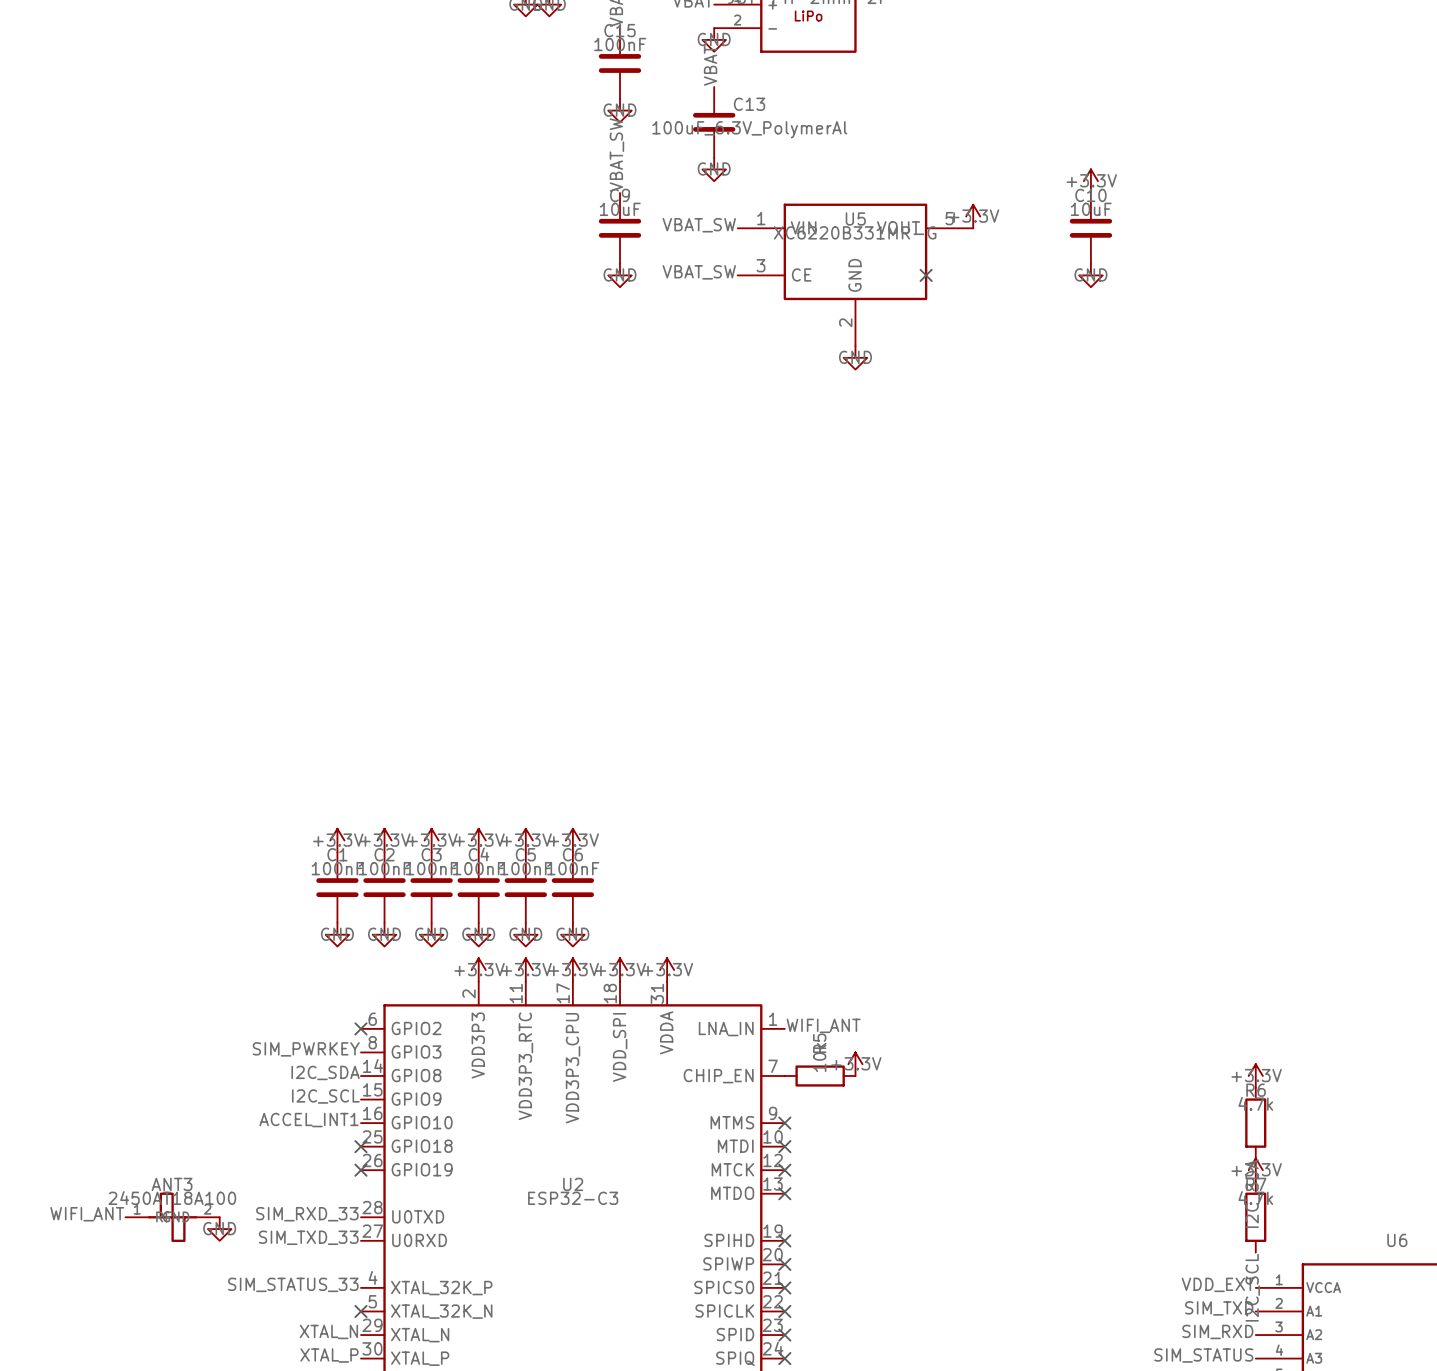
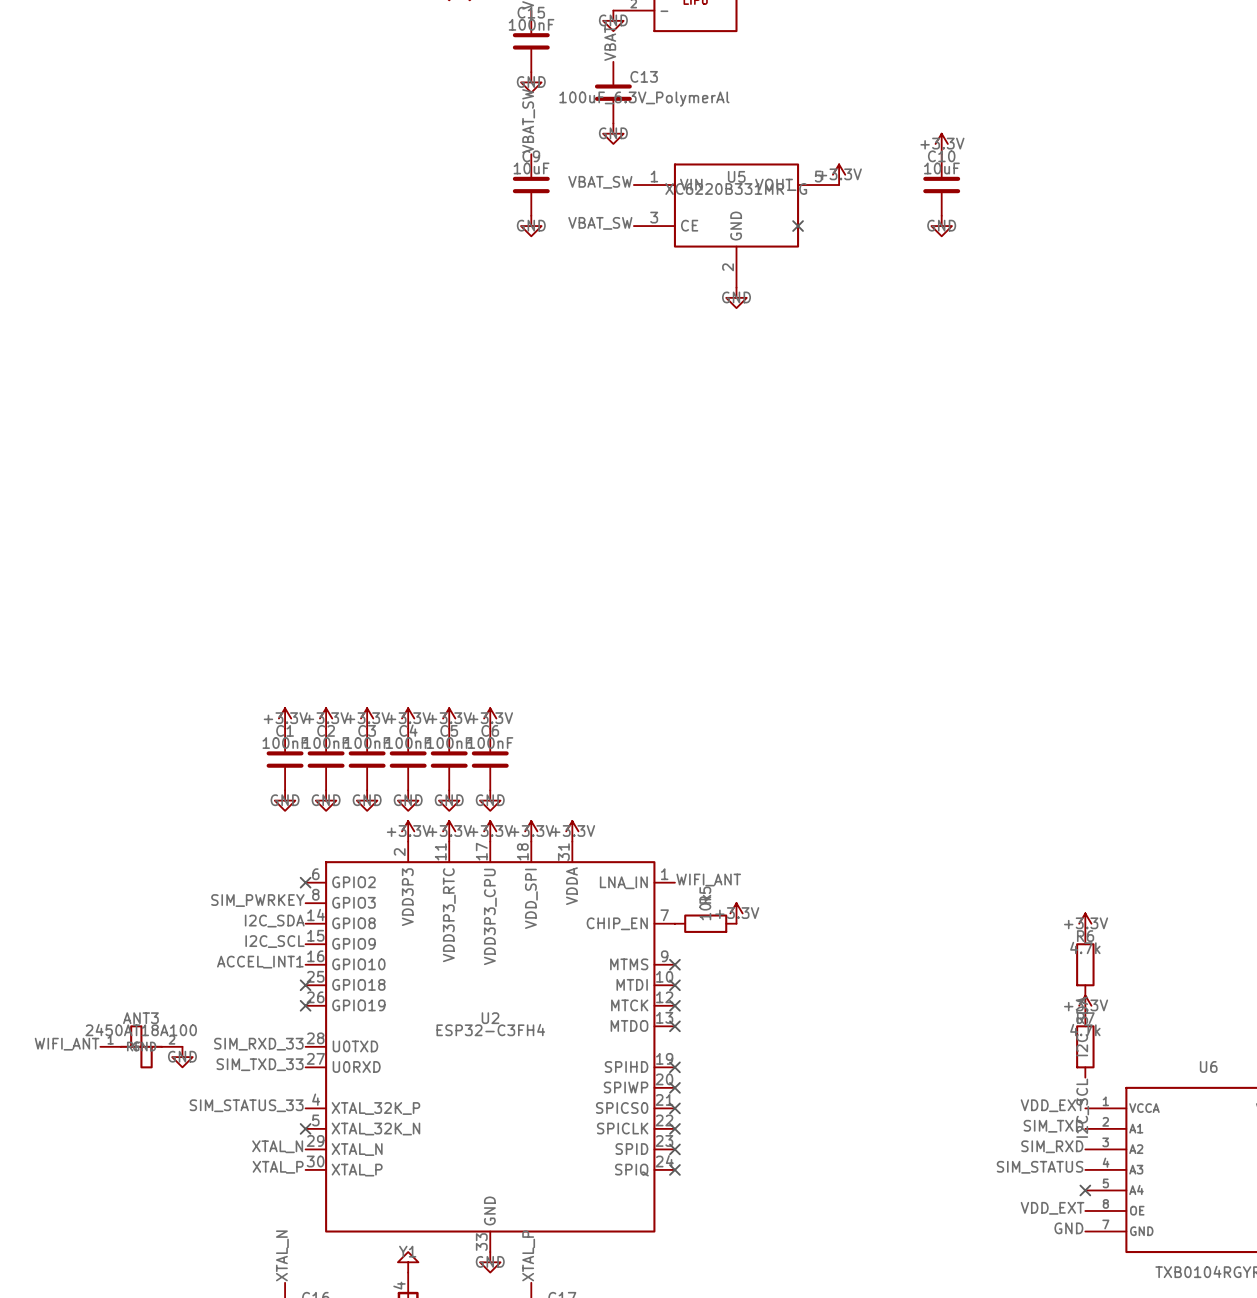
U2 value: ESP32-C3 (573, 1198) -> ESP32-C3FH4 (490, 1030)

